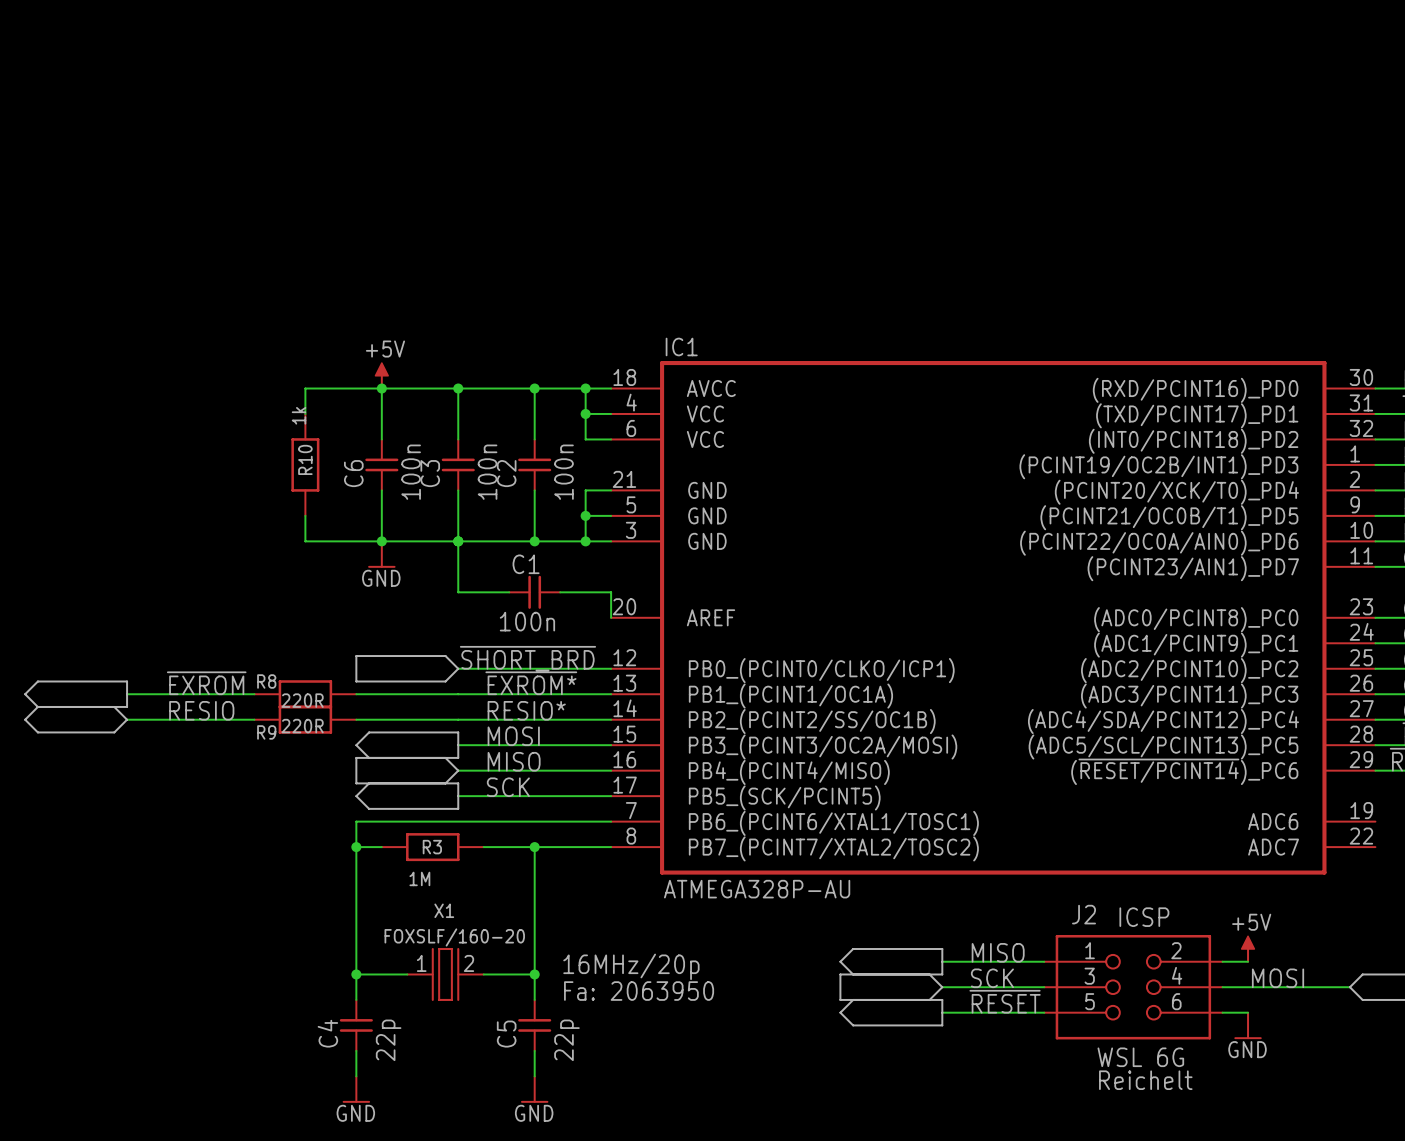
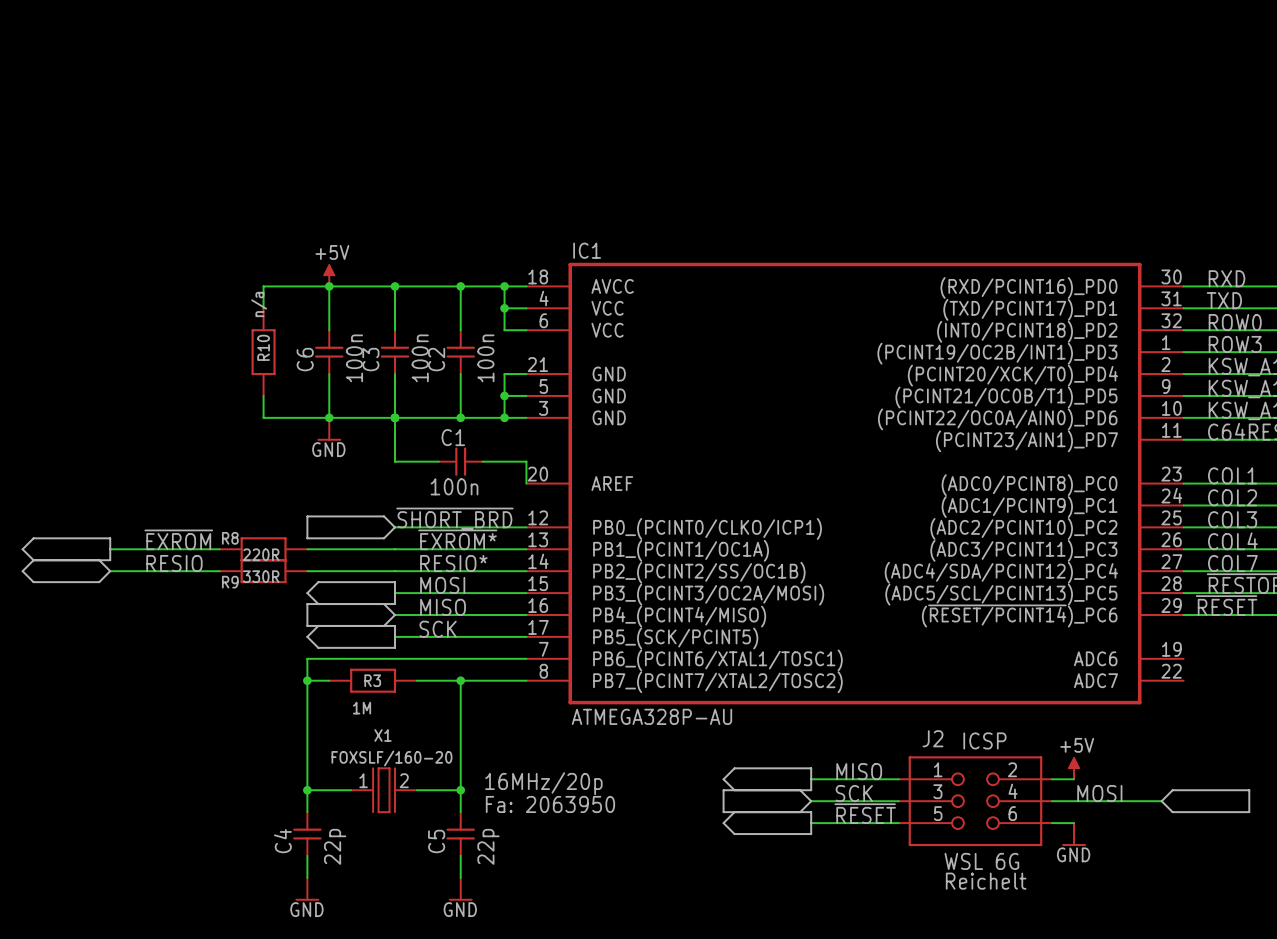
R10 value: 1k (299, 415) -> n/a (259, 304)
R9 value: 220R (302, 726) -> 330R (261, 576)

